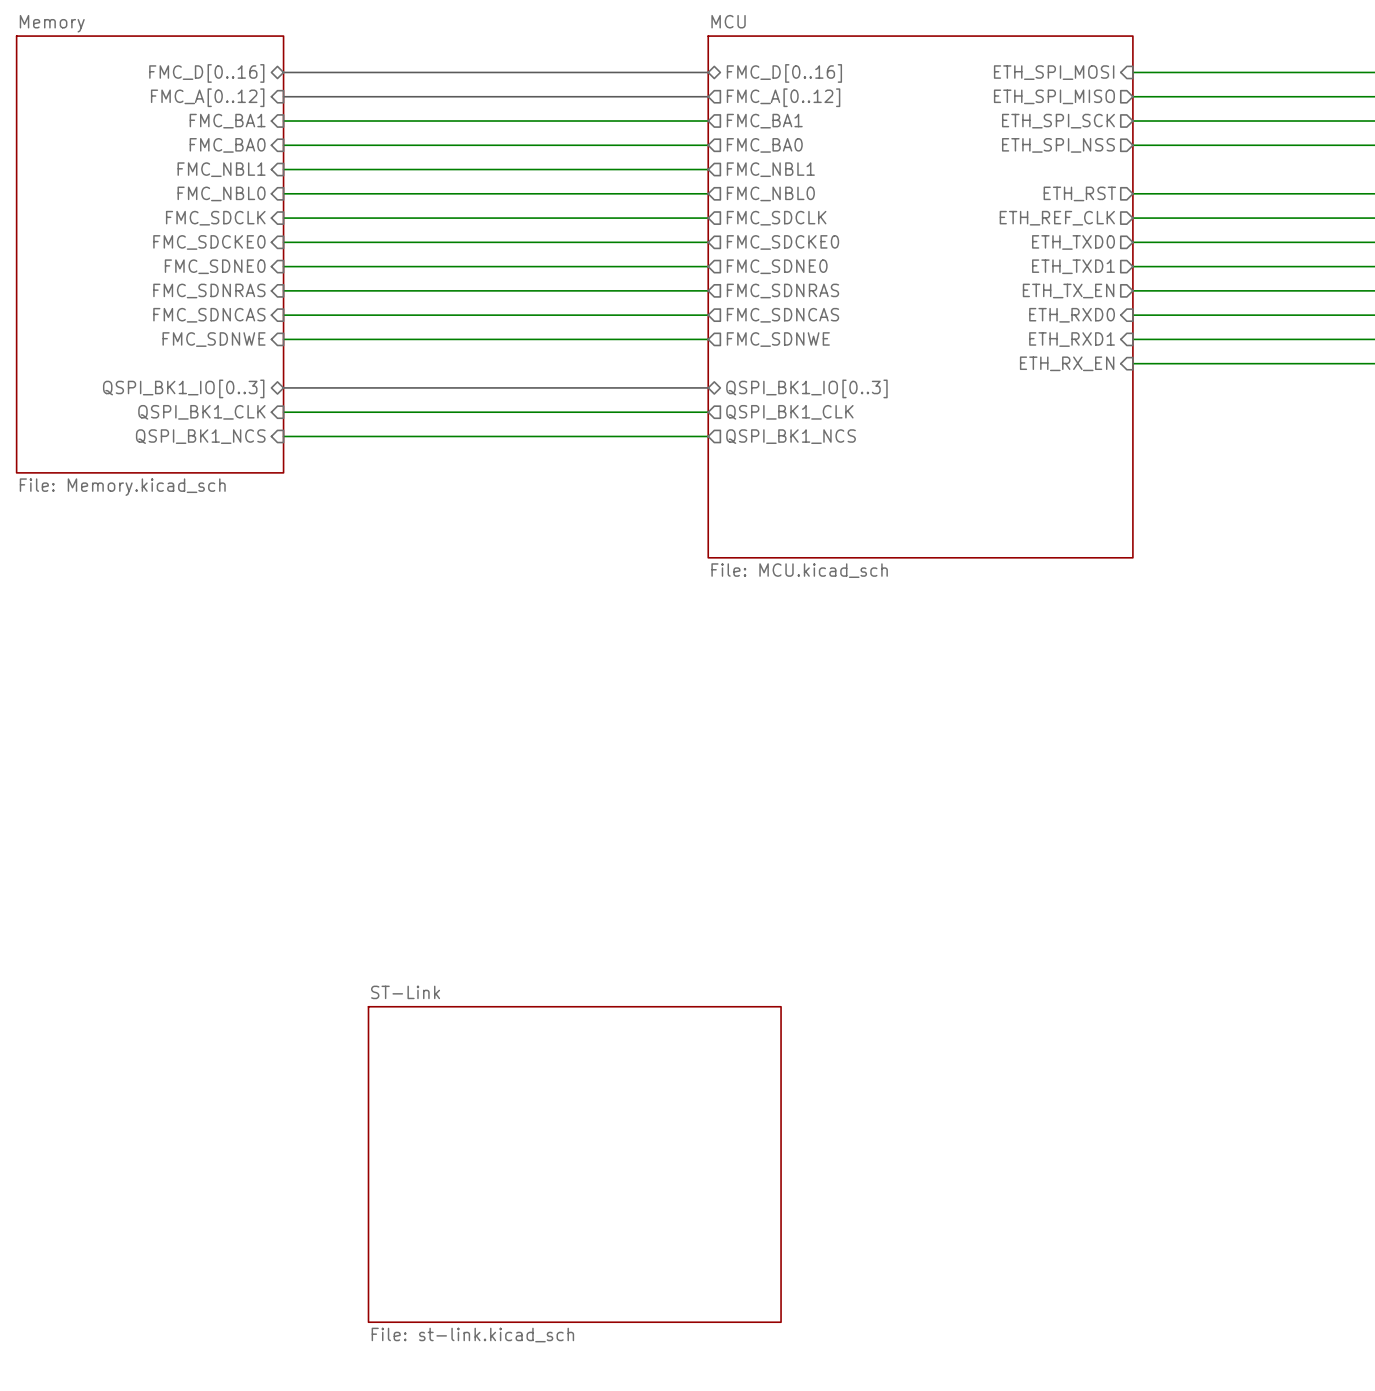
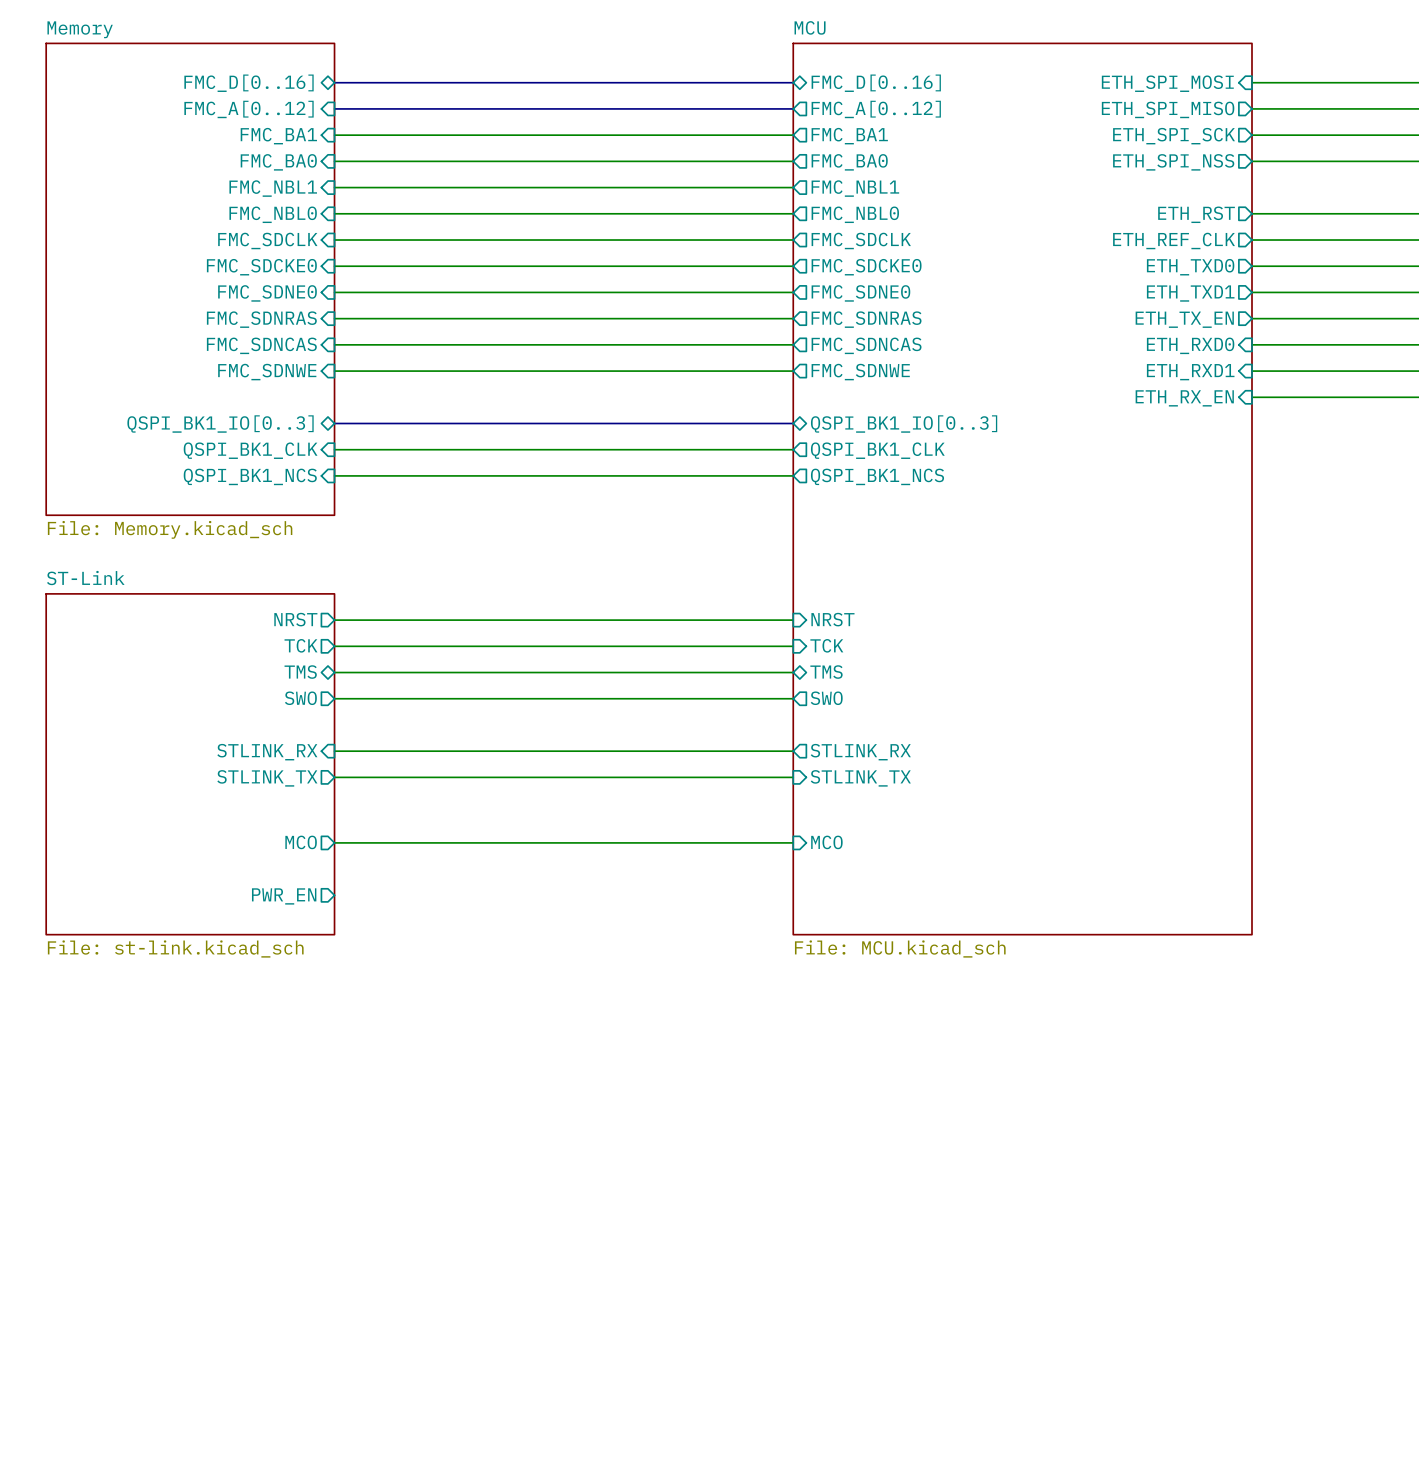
sheet MCU: File: MCU.kicad_sch (920, 296) -> none
sheet MCU: none -> File: MCU.kicad_sch (1022, 489)
sheet pin: none -> NRST (295, 619)
wire: none -> (334, 620) (793, 620)
sheet pin: none -> NRST (832, 619)
sheet pin: none -> TCK (301, 645)
sheet pin: none -> TCK (826, 645)
wire: none -> (334, 646) (793, 646)
sheet pin: none -> TMS (300, 672)
wire: none -> (334, 672) (793, 672)
sheet pin: none -> TMS (826, 672)
sheet pin: none -> SWO (300, 698)
wire: none -> (334, 698) (793, 698)
sheet pin: none -> SWO (826, 698)
sheet pin: none -> STLINK_RX (267, 752)
wire: none -> (334, 751) (793, 751)
sheet pin: none -> STLINK_RX (860, 752)
sheet ST-Link: none -> File: st-link.kicad_sch (190, 764)
sheet pin: none -> STLINK_TX (267, 778)
wire: none -> (334, 777) (793, 777)
sheet pin: none -> STLINK_TX (860, 778)
sheet pin: none -> MCO (301, 842)
sheet pin: none -> MCO (826, 842)
wire: none -> (334, 842) (793, 842)
sheet pin: none -> PWR_EN (284, 896)
sheet ST-Link: File: st-link.kicad_sch (574, 1164) -> none

